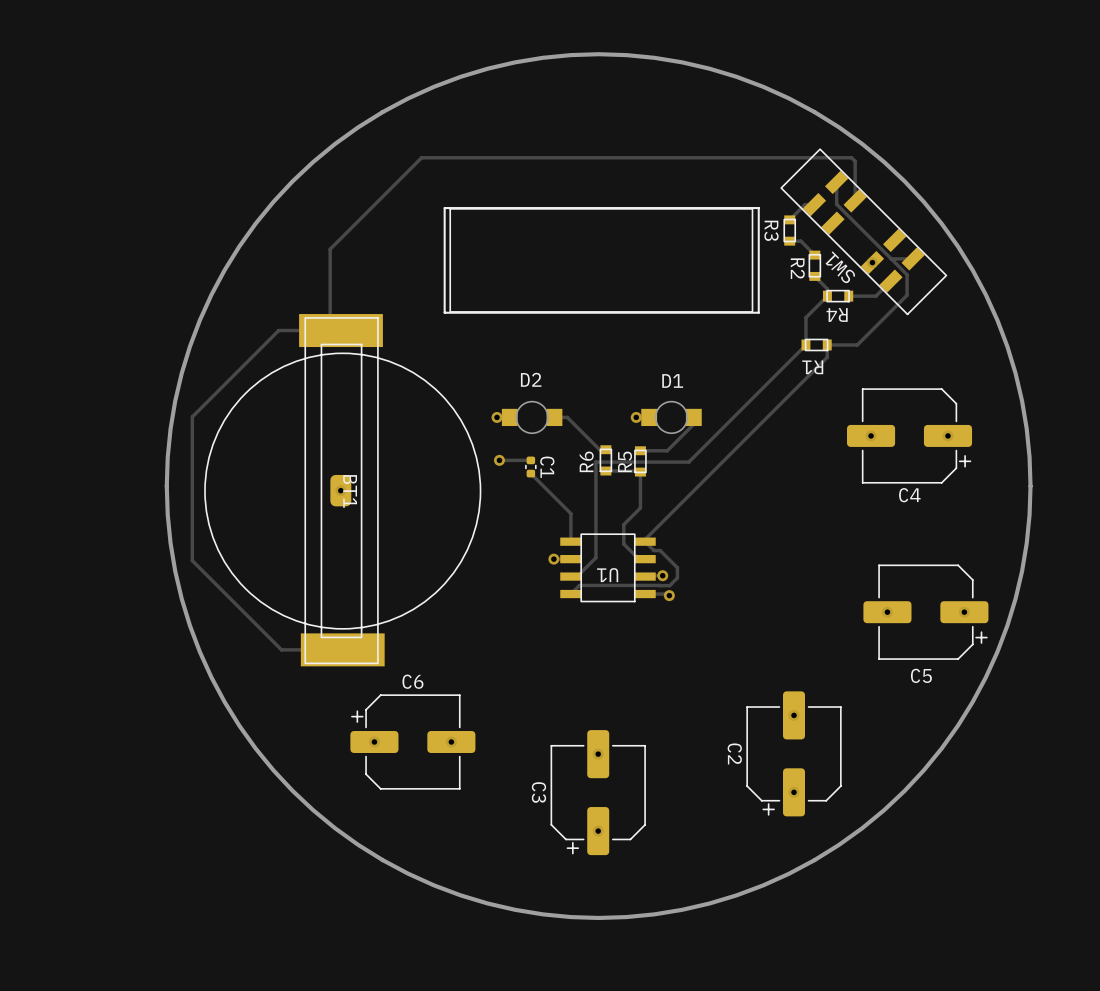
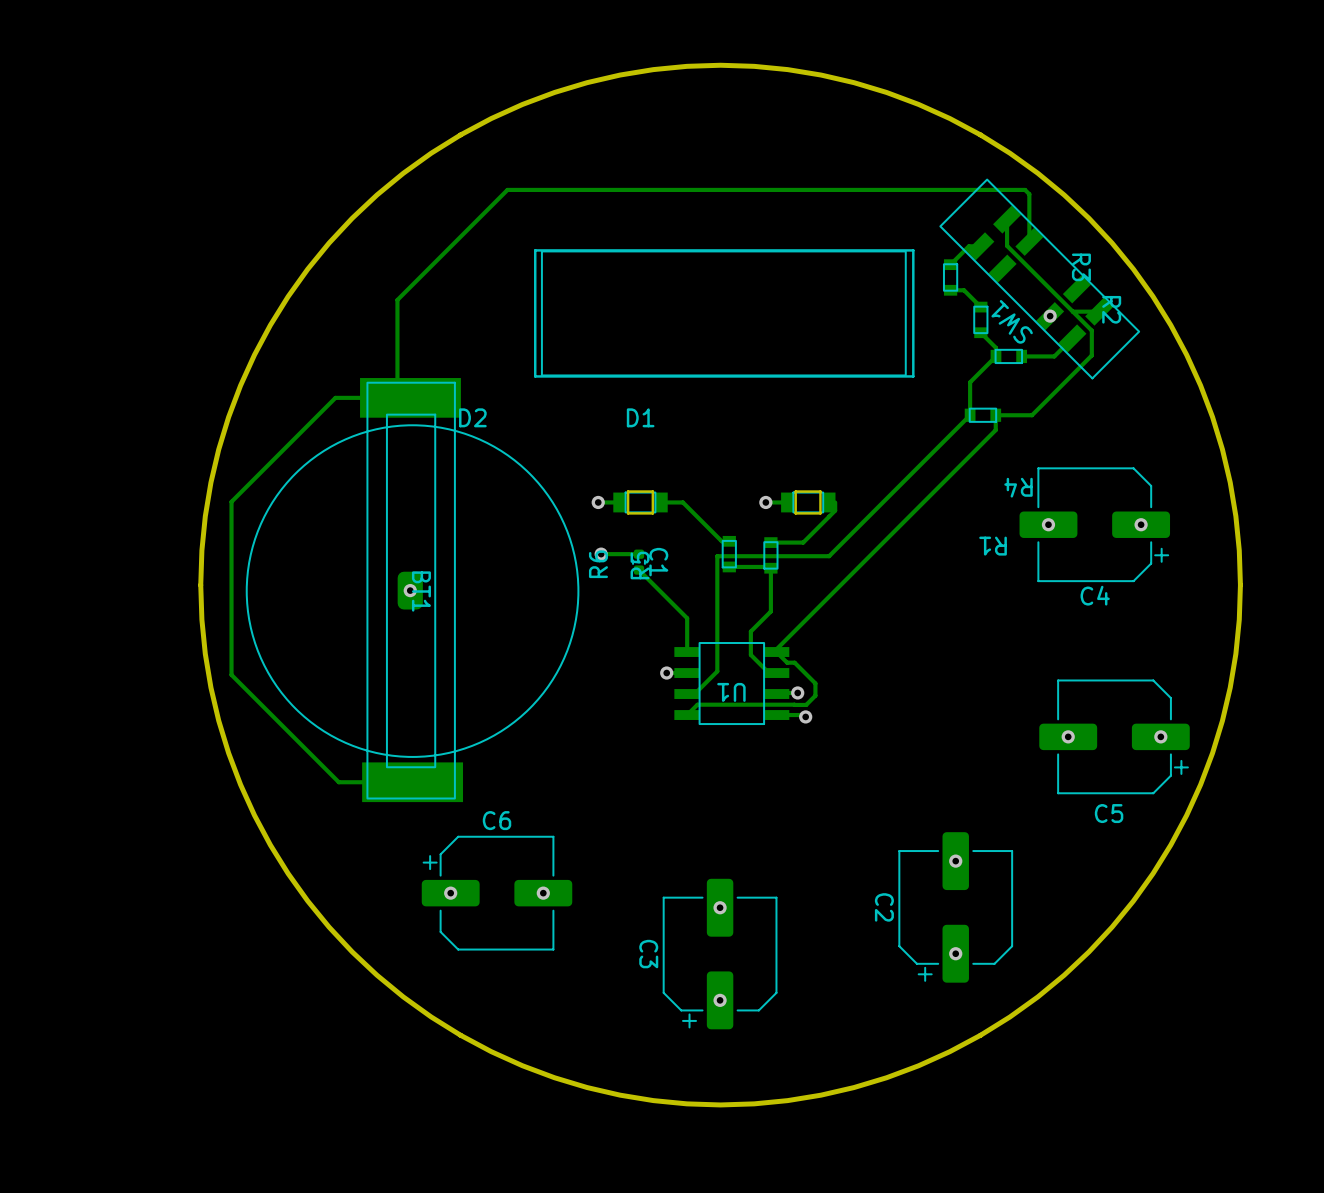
R3 name position: R3 (771, 230) -> R3 (1081, 267)
R2 name position: R2 (797, 268) -> R2 (1111, 309)
R4 name position: R4 (837, 315) -> R4 (1018, 487)
R1 name position: R1 (812, 367) -> R1 (993, 546)
D2 name position: D2 (531, 379) -> D2 (472, 417)
D1 name position: D1 (672, 380) -> D1 (640, 417)
D2 footprint: [501, 400, 563, 435] -> [613, 491, 668, 514]
D1 footprint: [641, 400, 702, 435] -> [781, 491, 836, 514]
board edge: none -> (652, 491) (628, 491) (628, 513) (652, 513) (652, 491)
board edge: none -> (820, 491) (795, 491) (795, 513) (820, 513) (820, 491)
R6 name position: R6 (586, 461) -> R6 (598, 564)
R5 name position: R5 (625, 461) -> R5 (640, 565)

